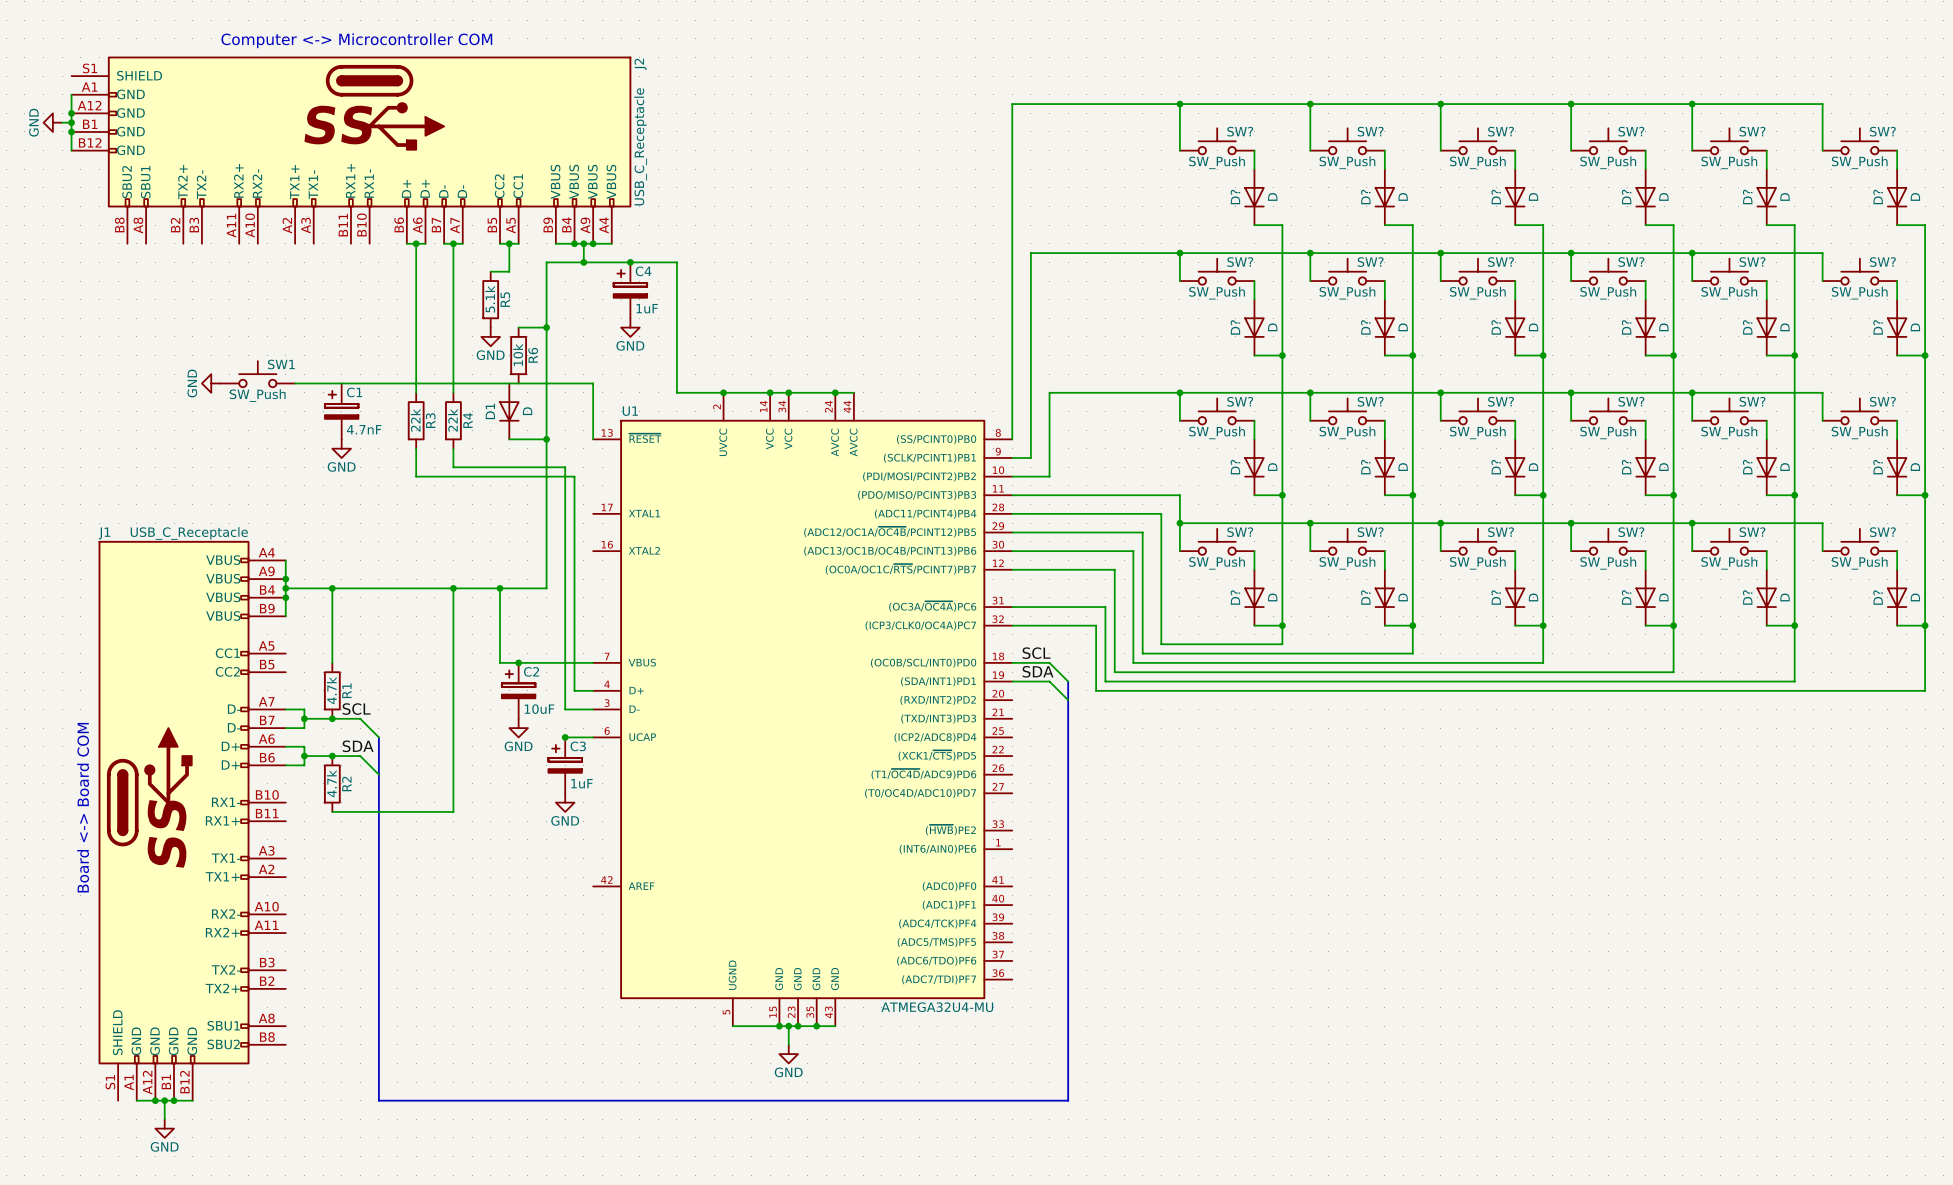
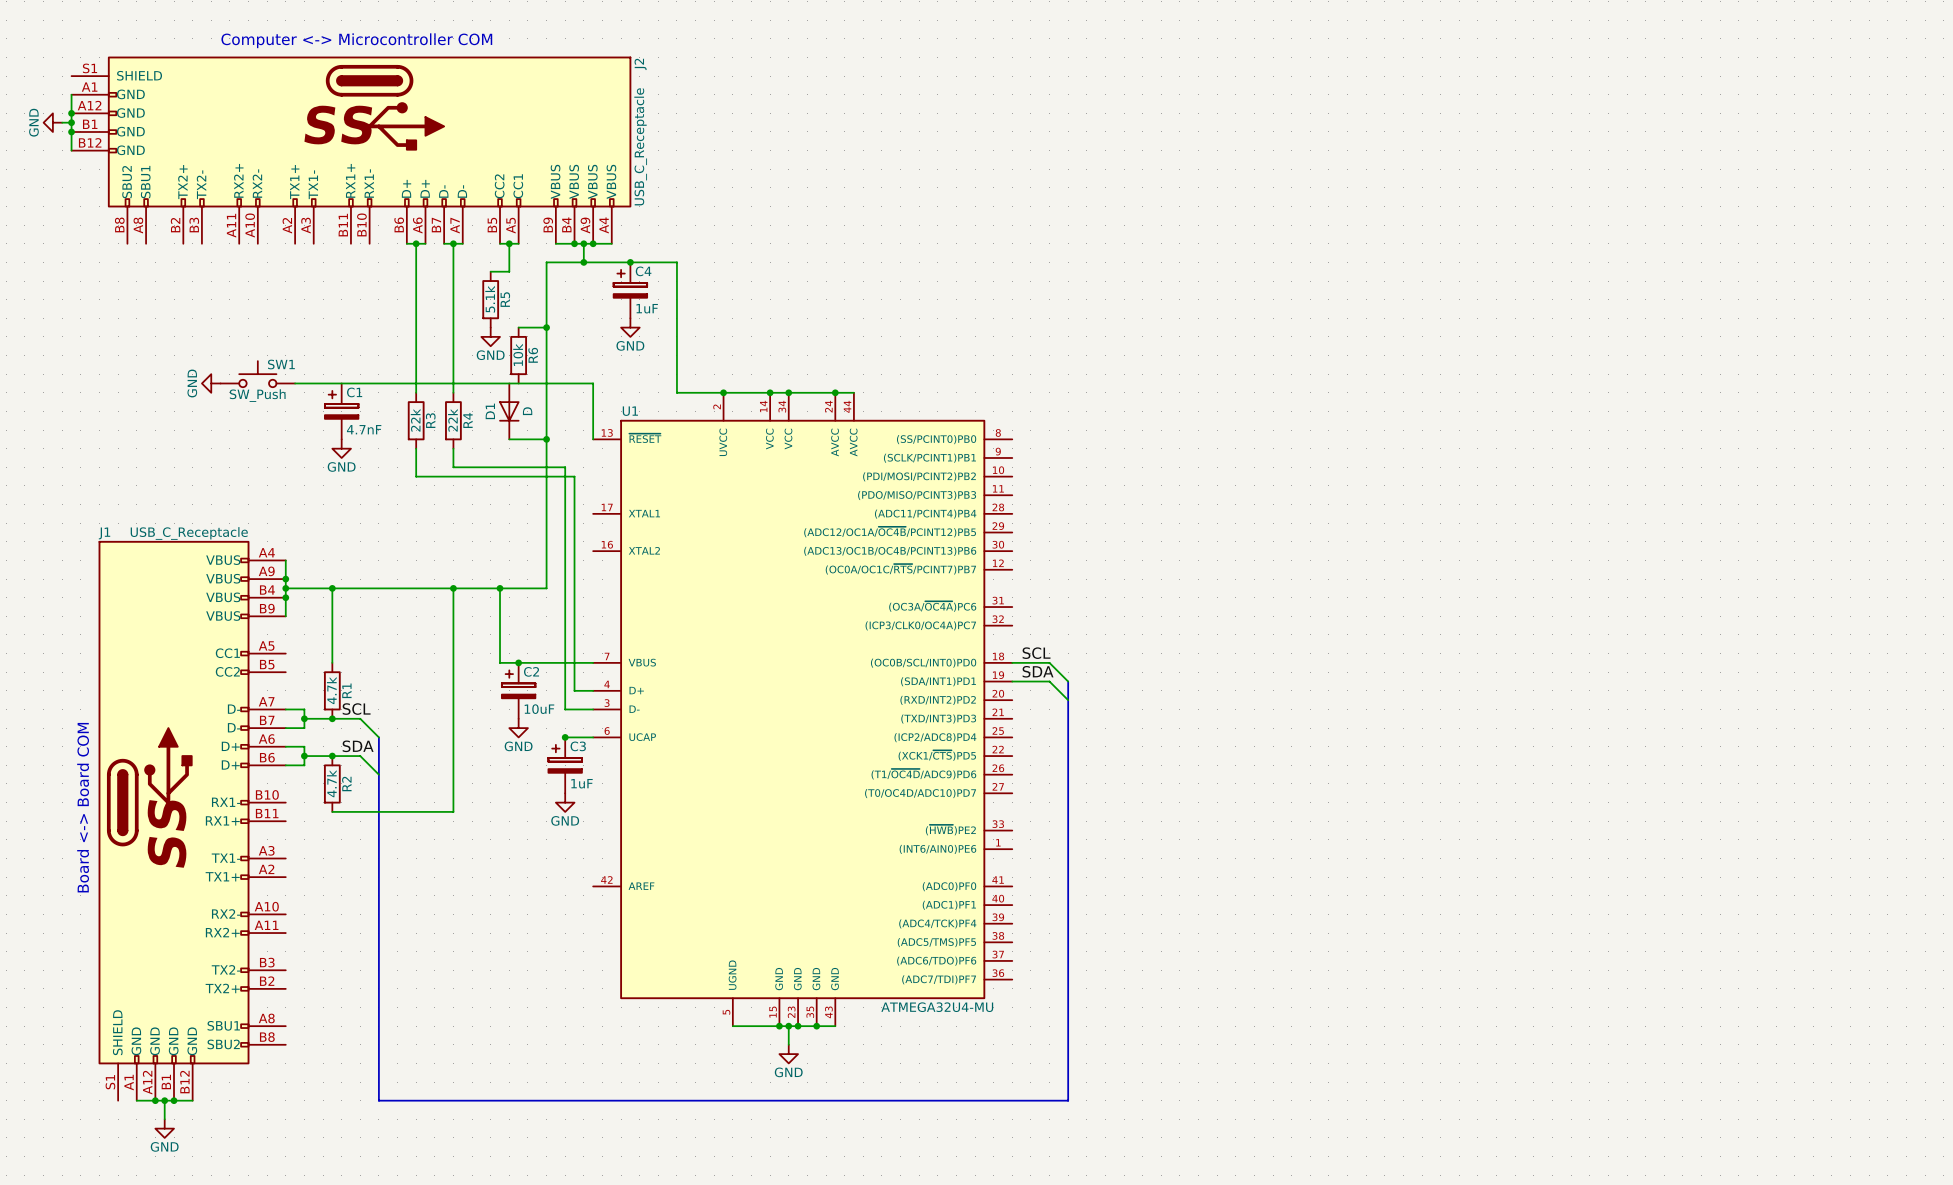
wire: (1179, 104) (1179, 150) -> none
junction: (1179, 104) -> none
wire: (1310, 104) (1310, 150) -> none
junction: (1310, 104) -> none
wire: (1440, 104) (1440, 150) -> none
junction: (1440, 104) -> none
wire: (1571, 104) (1571, 150) -> none
junction: (1571, 104) -> none
wire: (1692, 104) (1692, 150) -> none
junction: (1692, 104) -> none
SW?: SW_Push (1217, 141) -> none
SW?: SW_Push (1347, 141) -> none
SW?: SW_Push (1477, 141) -> none
SW?: SW_Push (1608, 141) -> none
SW?: SW_Push (1729, 141) -> none
SW?: SW_Push (1859, 141) -> none
wire: (1254, 150) (1254, 169) -> none
wire: (1384, 150) (1384, 169) -> none
wire: (1515, 150) (1515, 169) -> none
wire: (1645, 150) (1645, 169) -> none
wire: (1766, 150) (1766, 169) -> none
wire: (1822, 150) (1822, 104) (1012, 104) (1012, 439) -> none
wire: (1897, 150) (1897, 169) -> none
D?: D (1254, 197) -> none
D?: D (1384, 197) -> none
D?: D (1515, 197) -> none
D?: D (1645, 197) -> none
D?: D (1766, 197) -> none
D?: D (1897, 197) -> none
wire: (1254, 225) (1282, 225) (1282, 644) (1161, 644) (1161, 513) (1012, 513) -> none
wire: (1384, 225) (1412, 225) (1412, 653) (1142, 653) (1142, 532) (1012, 532) -> none
wire: (1515, 225) (1543, 225) (1543, 662) (1133, 662) (1133, 551) (1012, 551) -> none
wire: (1645, 225) (1673, 225) (1673, 672) (1114, 672) (1114, 569) (1012, 569) -> none
wire: (1766, 225) (1794, 225) (1794, 681) (1105, 681) (1105, 607) (1012, 607) -> none
wire: (1897, 225) (1925, 225) (1925, 690) (1096, 690) (1096, 625) (1012, 625) -> none
wire: (1179, 253) (1179, 281) -> none
junction: (1179, 253) -> none
wire: (1310, 253) (1310, 281) -> none
junction: (1310, 253) -> none
wire: (1440, 253) (1440, 281) -> none
junction: (1440, 253) -> none
wire: (1571, 253) (1571, 281) -> none
junction: (1571, 253) -> none
wire: (1692, 253) (1692, 281) -> none
junction: (1692, 253) -> none
SW?: SW_Push (1217, 271) -> none
SW?: SW_Push (1347, 271) -> none
SW?: SW_Push (1477, 271) -> none
SW?: SW_Push (1608, 271) -> none
SW?: SW_Push (1729, 271) -> none
SW?: SW_Push (1859, 271) -> none
wire: (1254, 281) (1254, 299) -> none
wire: (1384, 281) (1384, 299) -> none
wire: (1515, 281) (1515, 299) -> none
wire: (1645, 281) (1645, 299) -> none
wire: (1766, 281) (1766, 299) -> none
wire: (1822, 281) (1822, 253) (1030, 253) (1030, 457) (1012, 457) -> none
wire: (1897, 281) (1897, 299) -> none
D?: D (1254, 327) -> none
D?: D (1384, 327) -> none
D?: D (1515, 327) -> none
D?: D (1645, 327) -> none
D?: D (1766, 327) -> none
D?: D (1897, 327) -> none
wire: (1254, 355) (1282, 355) -> none
junction: (1282, 355) -> none
wire: (1384, 355) (1412, 355) -> none
junction: (1412, 355) -> none
wire: (1515, 355) (1543, 355) -> none
junction: (1543, 355) -> none
wire: (1645, 355) (1673, 355) -> none
junction: (1673, 355) -> none
wire: (1766, 355) (1794, 355) -> none
junction: (1794, 355) -> none
wire: (1897, 355) (1925, 355) -> none
junction: (1925, 355) -> none
wire: (1179, 392) (1179, 420) -> none
junction: (1179, 392) -> none
wire: (1310, 392) (1310, 420) -> none
junction: (1310, 392) -> none
wire: (1440, 392) (1440, 420) -> none
junction: (1440, 392) -> none
wire: (1571, 392) (1571, 420) -> none
junction: (1571, 392) -> none
wire: (1692, 392) (1692, 420) -> none
junction: (1692, 392) -> none
SW?: SW_Push (1217, 411) -> none
SW?: SW_Push (1347, 411) -> none
SW?: SW_Push (1477, 411) -> none
SW?: SW_Push (1608, 411) -> none
SW?: SW_Push (1729, 411) -> none
SW?: SW_Push (1859, 411) -> none
wire: (1254, 420) (1254, 439) -> none
wire: (1384, 420) (1384, 439) -> none
wire: (1515, 420) (1515, 439) -> none
wire: (1645, 420) (1645, 439) -> none
wire: (1766, 420) (1766, 439) -> none
wire: (1822, 420) (1822, 392) (1049, 392) (1049, 476) (1012, 476) -> none
wire: (1897, 420) (1897, 439) -> none
D?: D (1254, 467) -> none
D?: D (1384, 467) -> none
D?: D (1515, 467) -> none
D?: D (1645, 467) -> none
D?: D (1766, 467) -> none
D?: D (1897, 467) -> none
wire: (1012, 495) (1179, 495) (1179, 551) -> none
wire: (1254, 495) (1282, 495) -> none
junction: (1282, 495) -> none
wire: (1384, 495) (1412, 495) -> none
junction: (1412, 495) -> none
wire: (1515, 495) (1543, 495) -> none
junction: (1543, 495) -> none
wire: (1645, 495) (1673, 495) -> none
junction: (1673, 495) -> none
wire: (1766, 495) (1794, 495) -> none
junction: (1794, 495) -> none
wire: (1897, 495) (1925, 495) -> none
junction: (1925, 495) -> none
wire: (1179, 523) (1822, 523) (1822, 551) -> none
junction: (1179, 523) -> none
wire: (1310, 523) (1310, 551) -> none
junction: (1310, 523) -> none
wire: (1440, 523) (1440, 551) -> none
junction: (1440, 523) -> none
wire: (1571, 523) (1571, 551) -> none
junction: (1571, 523) -> none
wire: (1692, 523) (1692, 551) -> none
junction: (1692, 523) -> none
SW?: SW_Push (1217, 541) -> none
SW?: SW_Push (1347, 541) -> none
SW?: SW_Push (1477, 541) -> none
SW?: SW_Push (1608, 541) -> none
SW?: SW_Push (1729, 541) -> none
SW?: SW_Push (1859, 541) -> none
wire: (1254, 551) (1254, 569) -> none
wire: (1384, 551) (1384, 569) -> none
wire: (1515, 551) (1515, 569) -> none
wire: (1645, 551) (1645, 569) -> none
wire: (1766, 551) (1766, 569) -> none
wire: (1897, 551) (1897, 569) -> none
D?: D (1254, 597) -> none
D?: D (1384, 597) -> none
D?: D (1515, 597) -> none
D?: D (1645, 597) -> none
D?: D (1766, 597) -> none
D?: D (1897, 597) -> none
wire: (1254, 625) (1282, 625) -> none
junction: (1282, 625) -> none
wire: (1384, 625) (1412, 625) -> none
junction: (1412, 625) -> none
wire: (1515, 625) (1543, 625) -> none
junction: (1543, 625) -> none
wire: (1645, 625) (1673, 625) -> none
junction: (1673, 625) -> none
wire: (1766, 625) (1794, 625) -> none
junction: (1794, 625) -> none
wire: (1897, 625) (1925, 625) -> none
junction: (1925, 625) -> none

